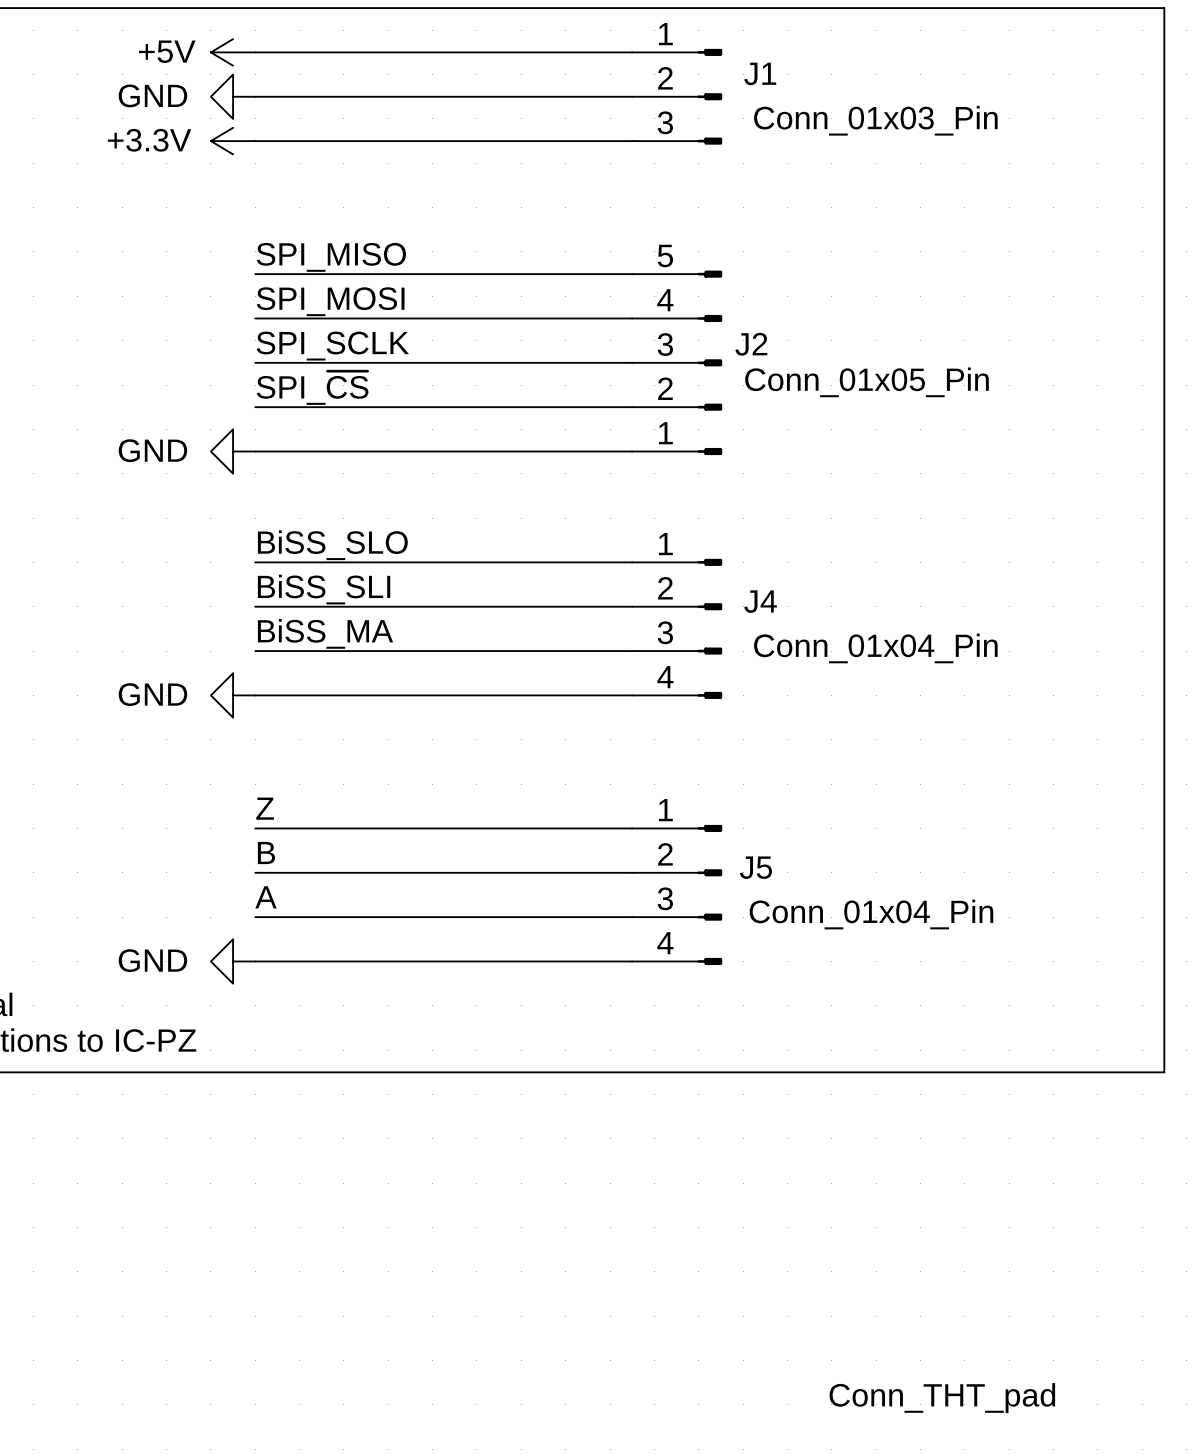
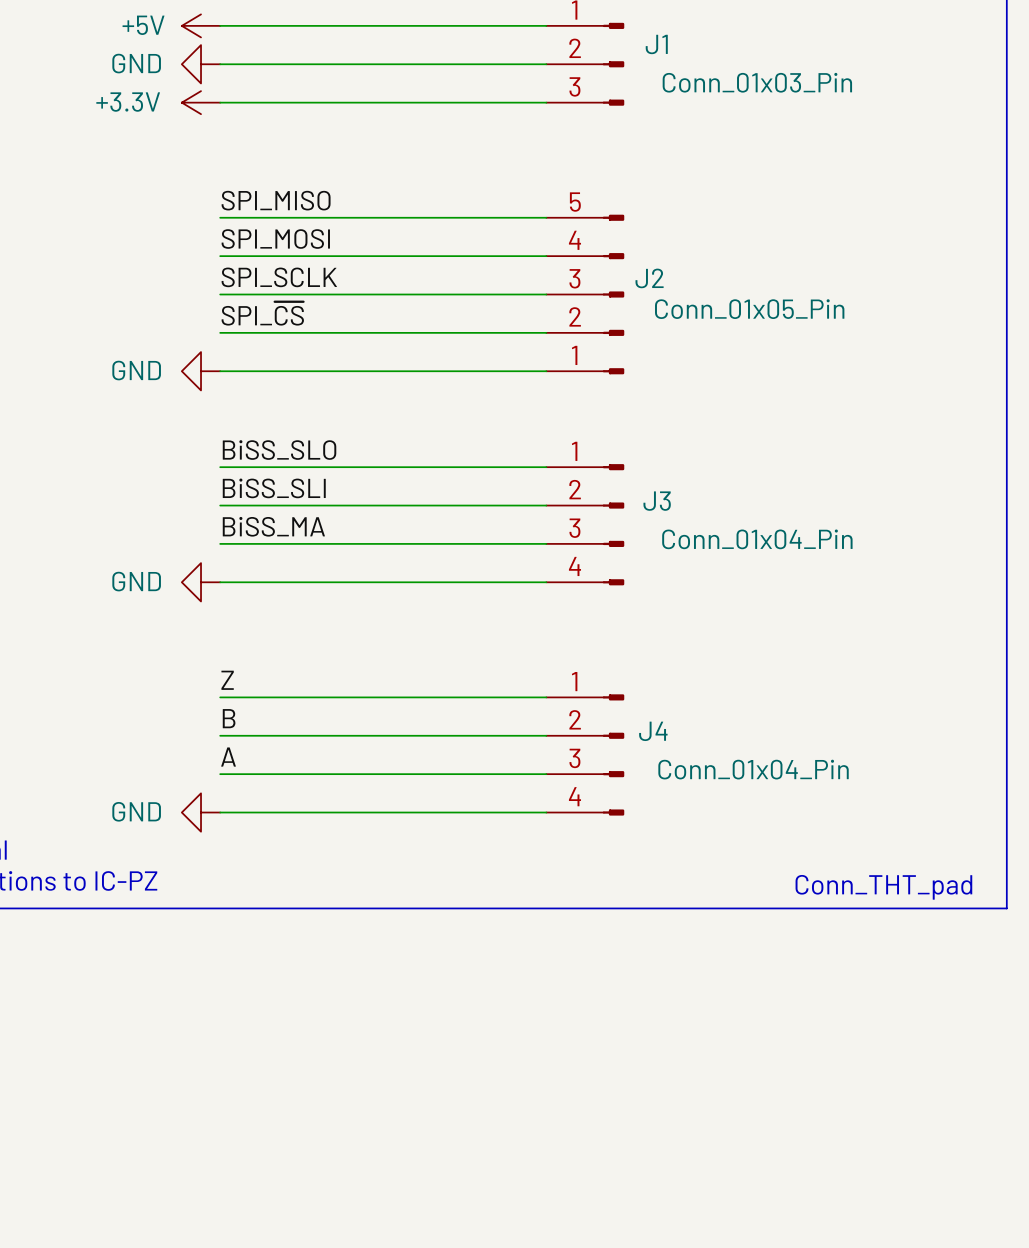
J4 name: J4 (760, 601) -> J3 (657, 501)
J5 name: J5 (755, 867) -> J4 (653, 731)
text position: Conn_THT_pad (942, 1398) -> Conn_THT_pad (883, 887)

